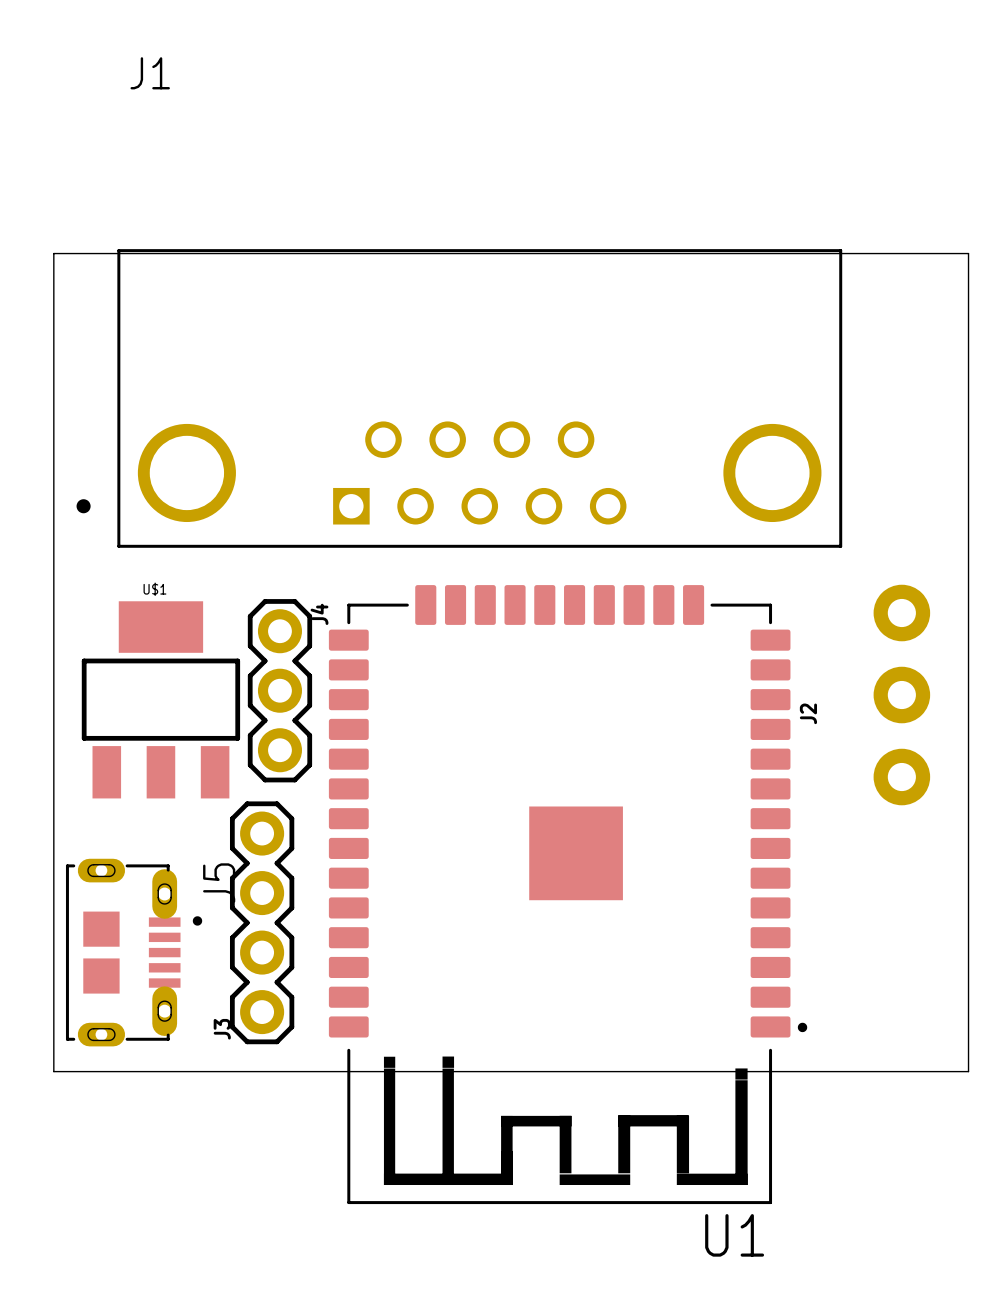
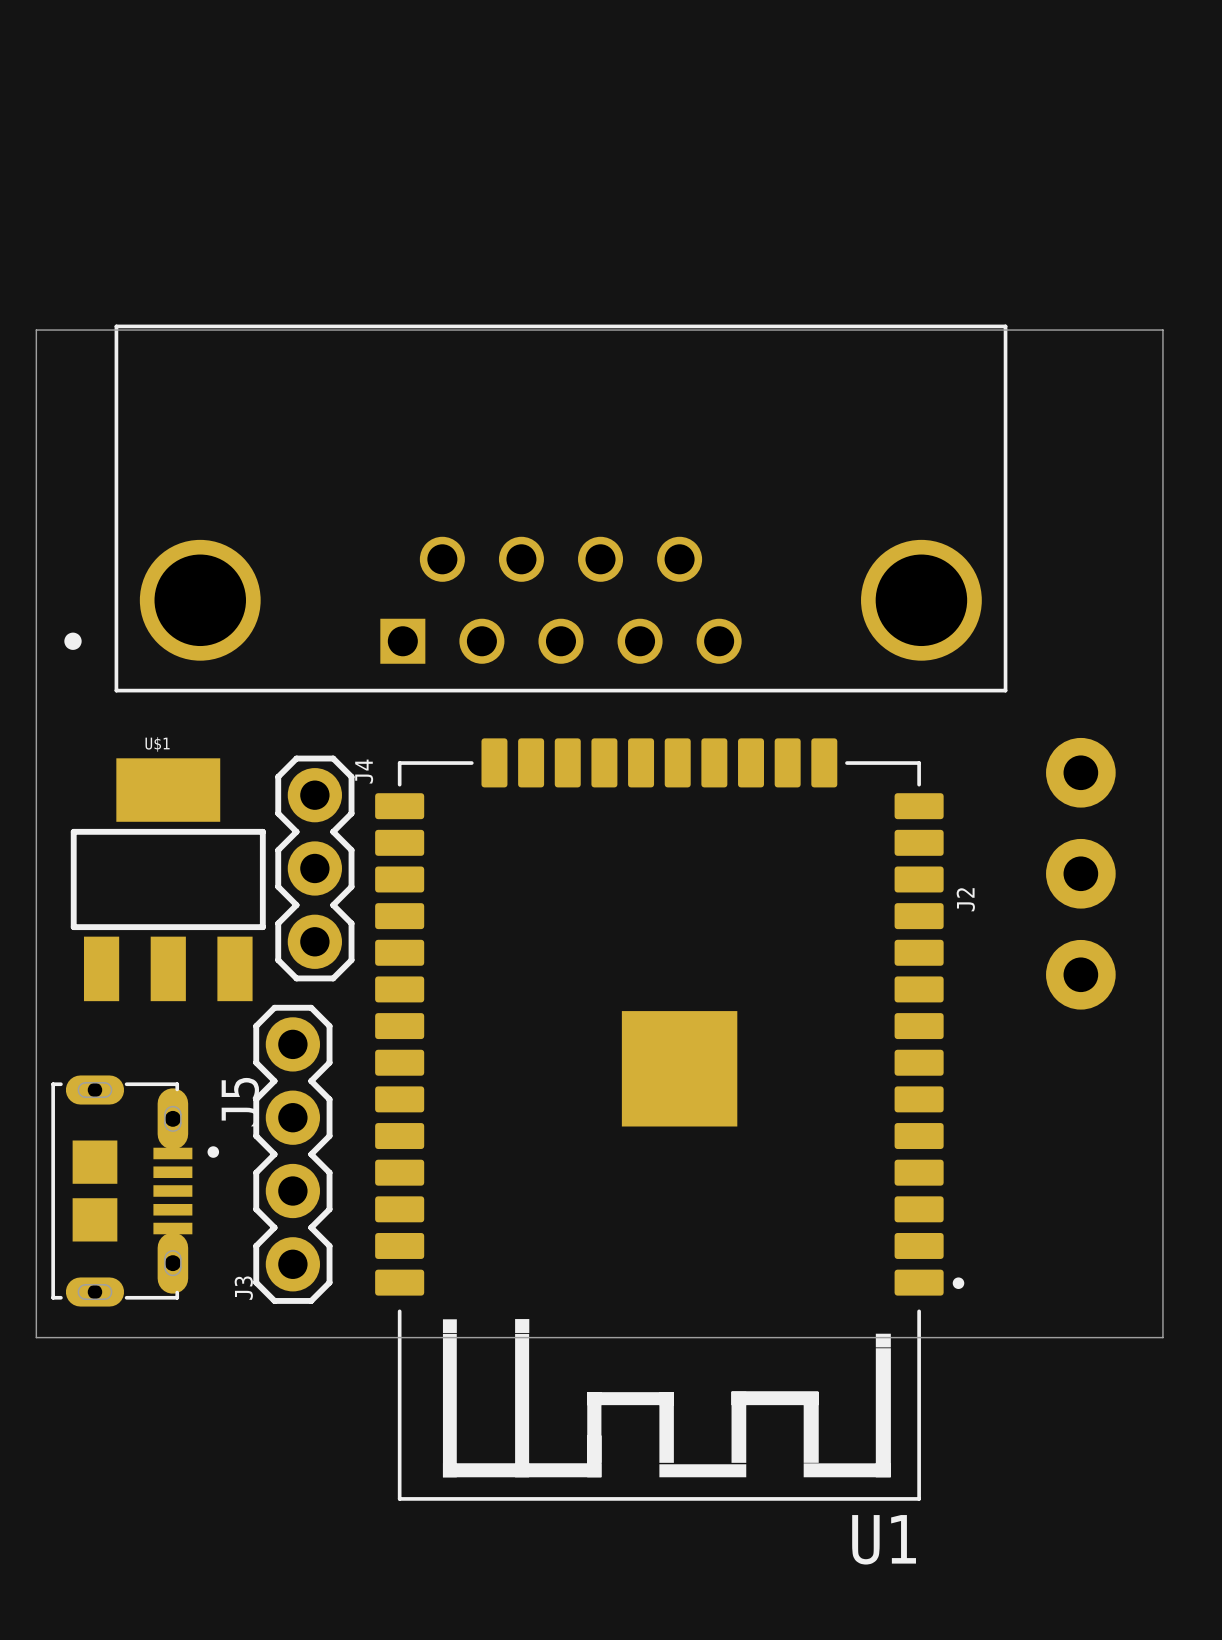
J1 name: J1 (150, 73) -> none

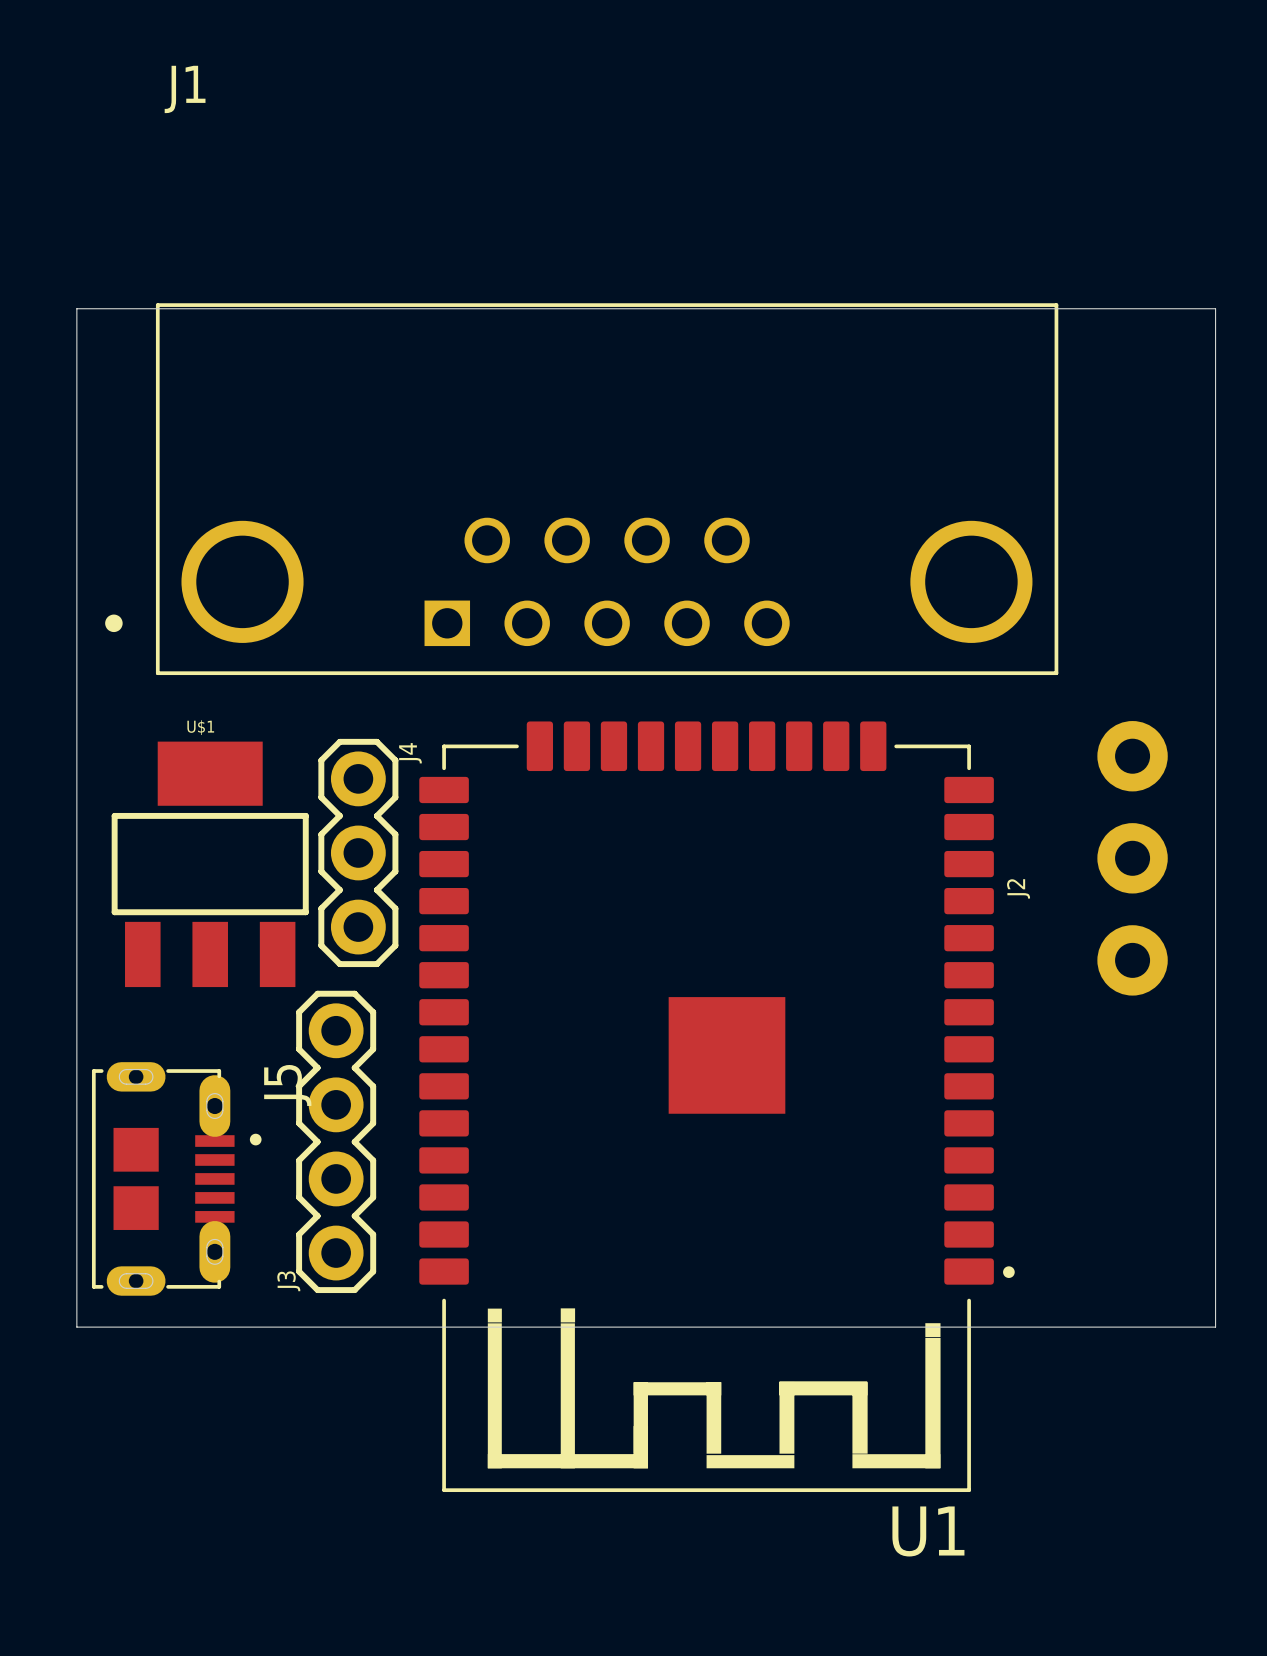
J1 name: none -> J1 (185, 89)

